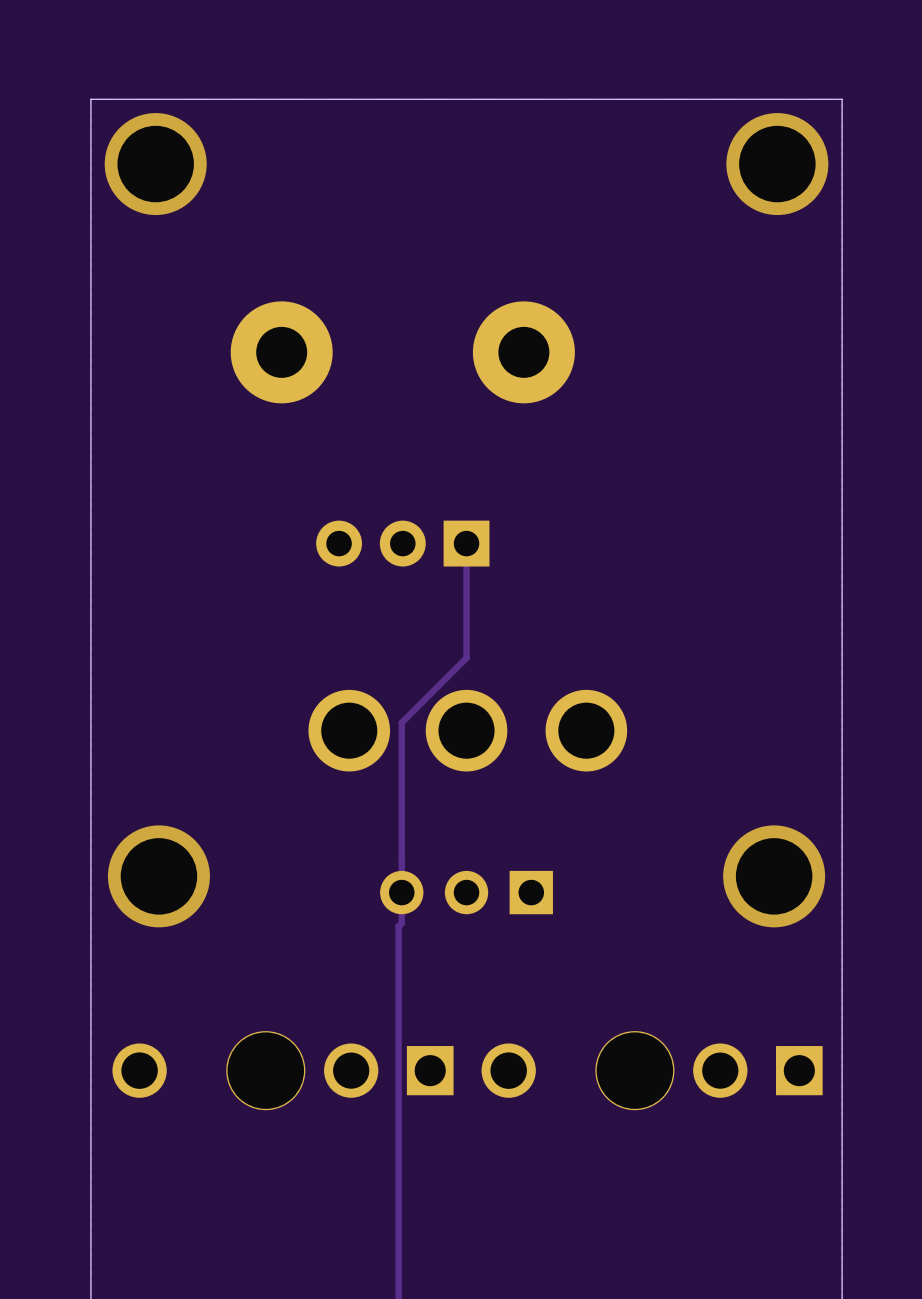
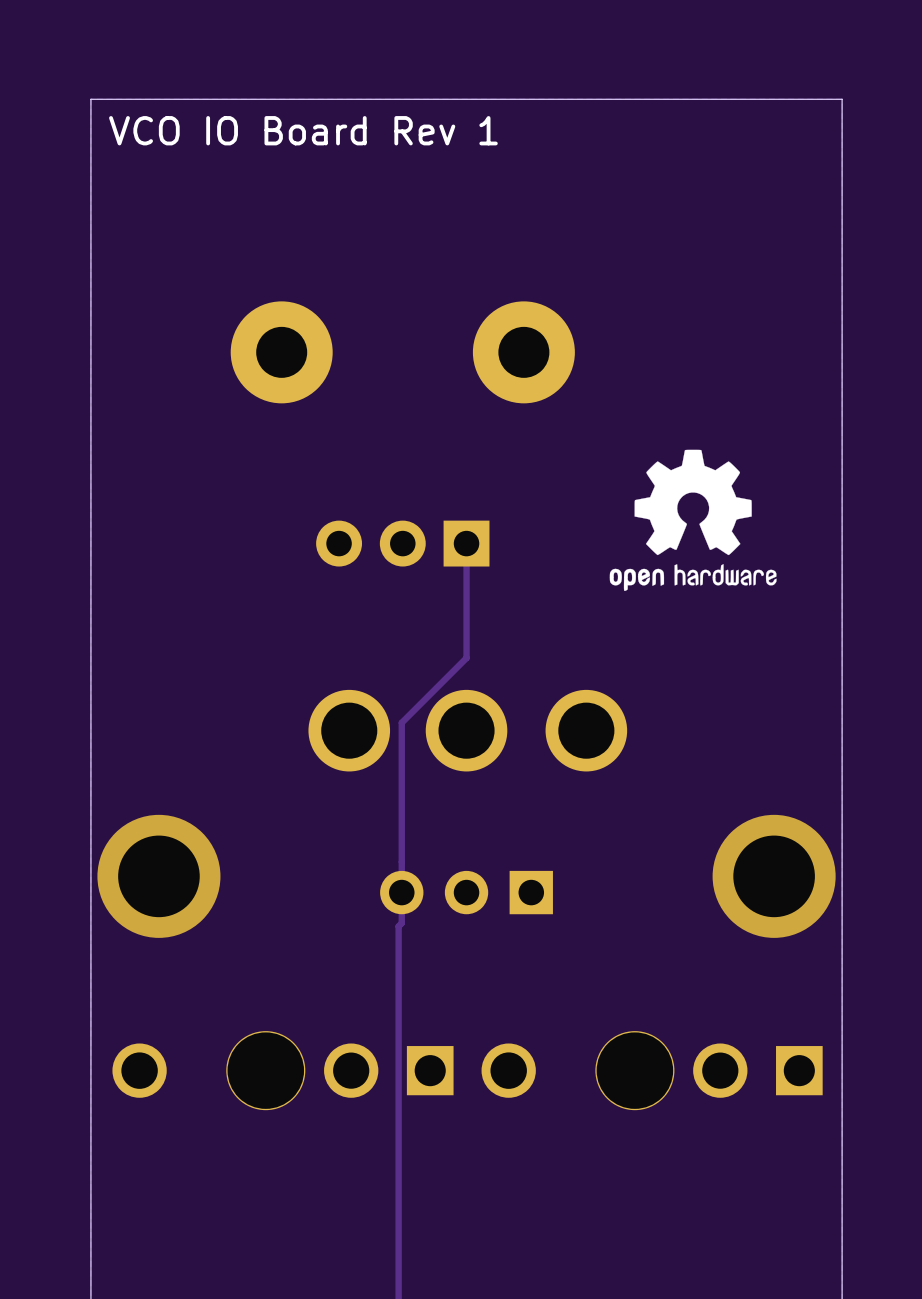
text: none -> VCO IO Board Rev 1 (303, 130)
via: (155, 164) -> none
via: (777, 164) -> none
drawing: none -> [609, 449, 777, 591]
via size: [107, 825, 210, 928] -> [97, 814, 221, 938]
via size: [723, 825, 826, 928] -> [712, 814, 836, 938]

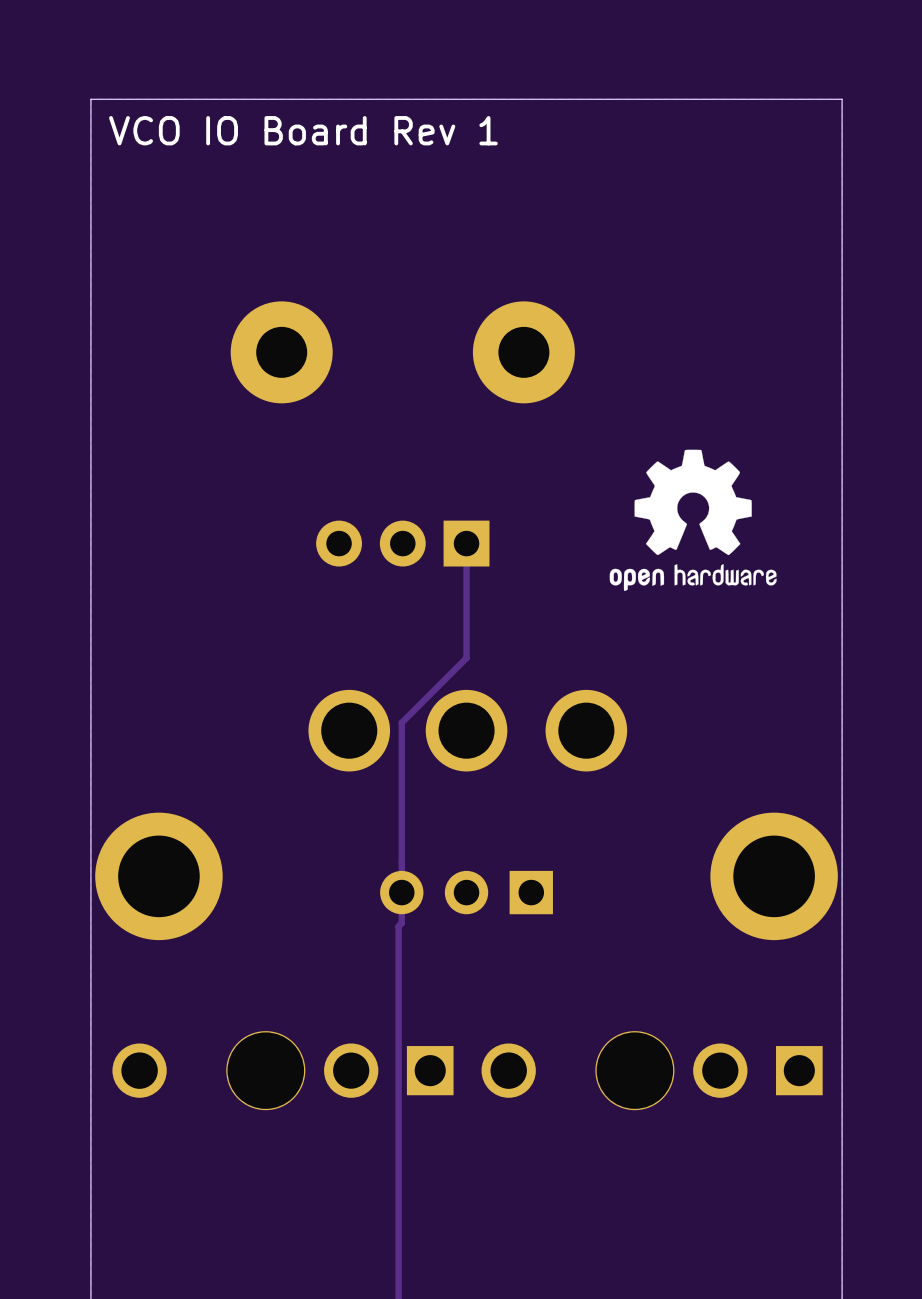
via: (158, 876) -> none
part: none -> (158, 876)
via: (774, 876) -> none
part: none -> (774, 876)

